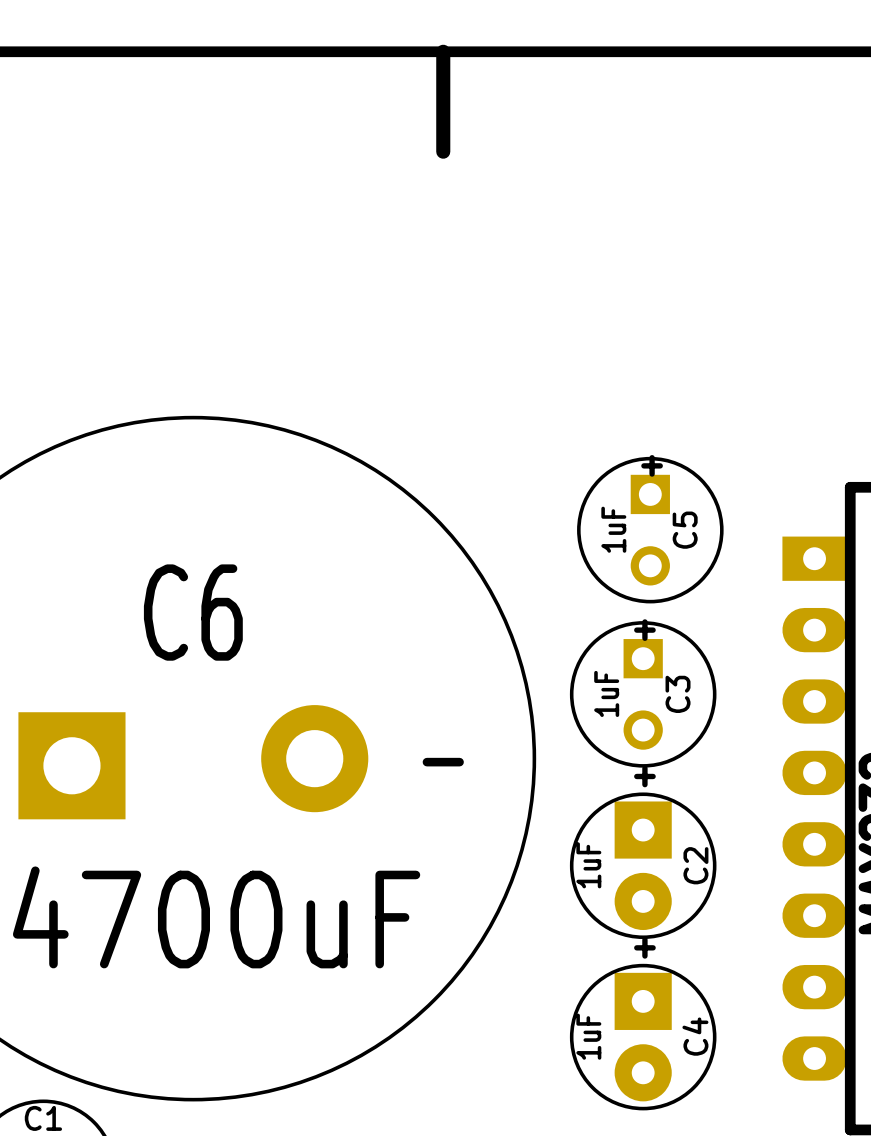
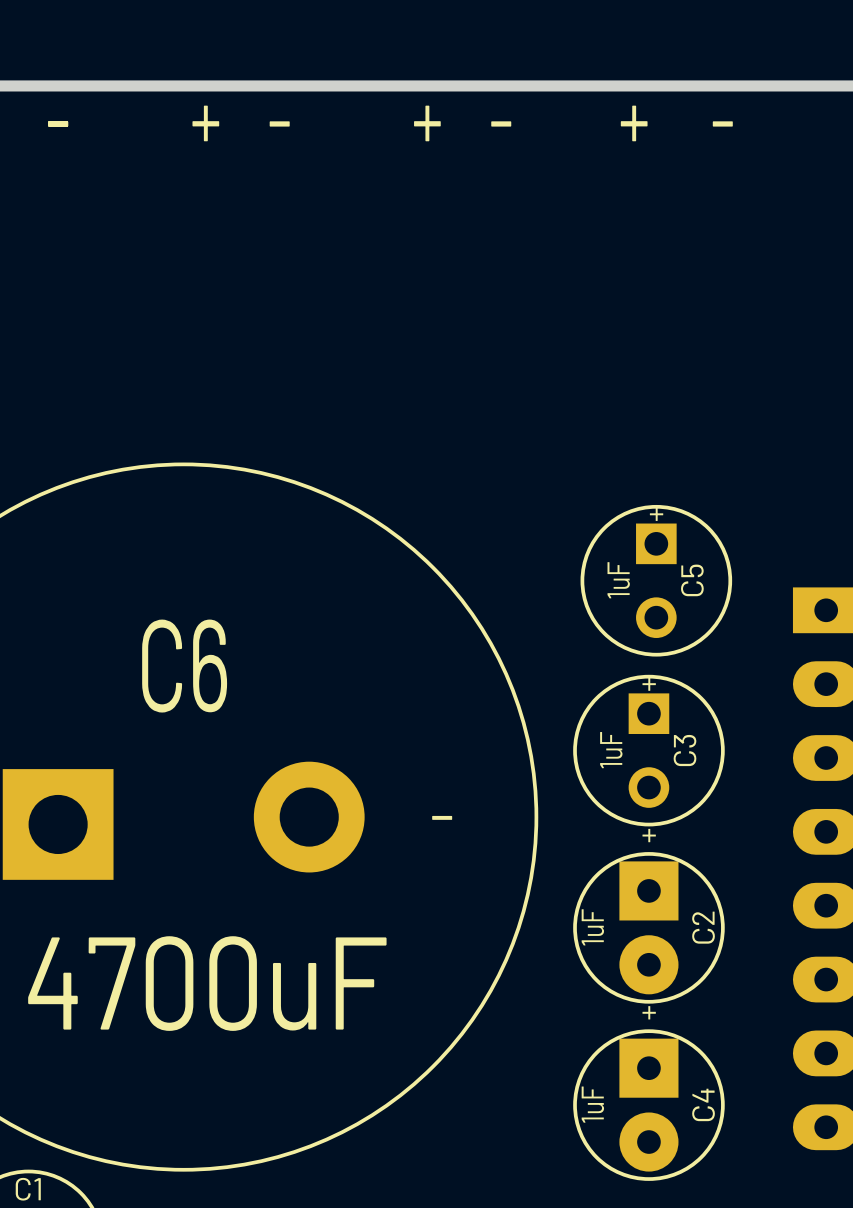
line: (443, 51) (443, 151) -> none
text: none -> - (58, 123)
text: none -> + (205, 123)
text: none -> - (279, 123)
text: none -> + (427, 123)
text: none -> - (501, 123)
text: none -> + (634, 123)
text: none -> - (722, 123)

